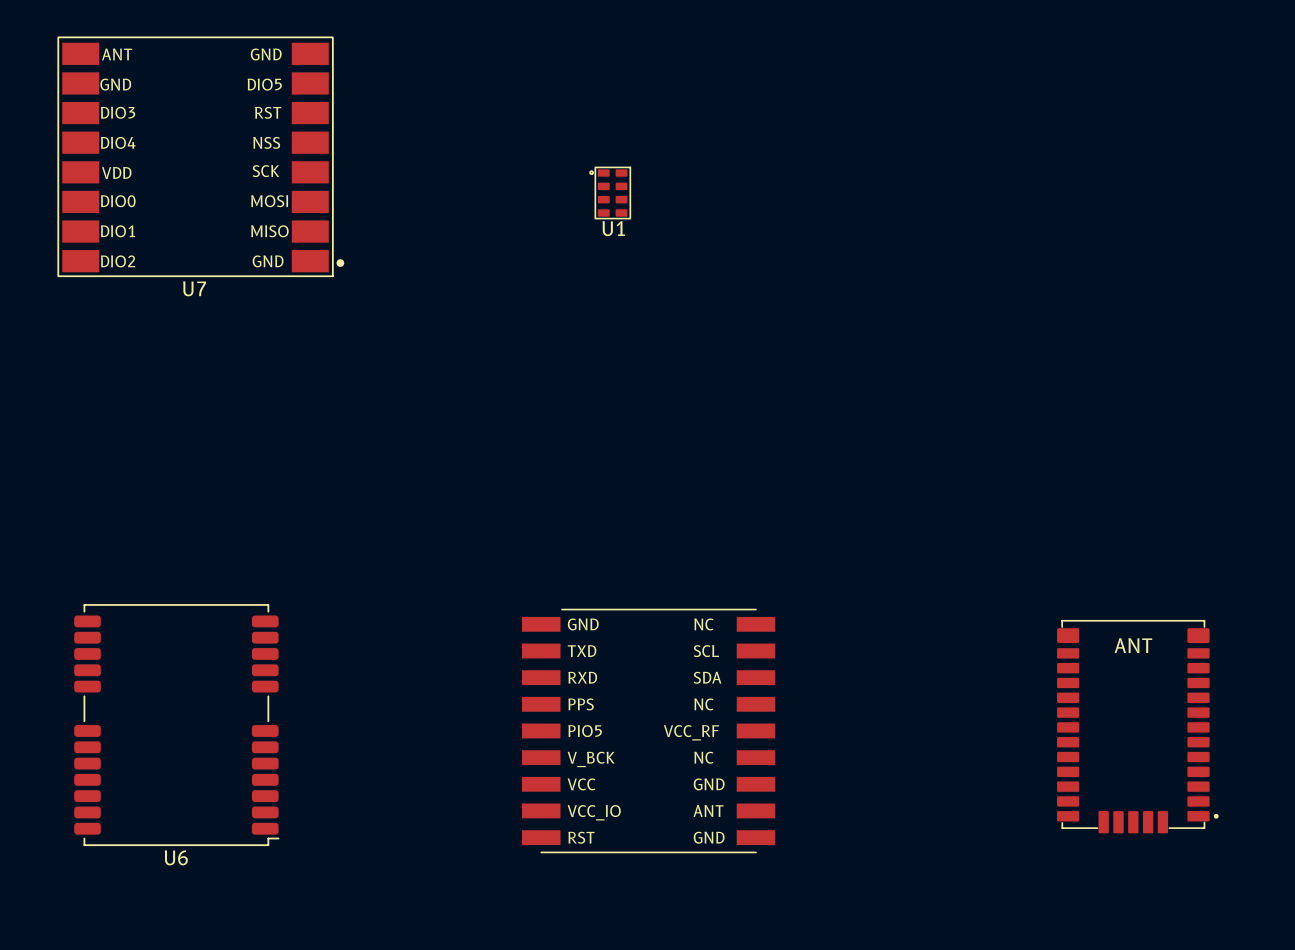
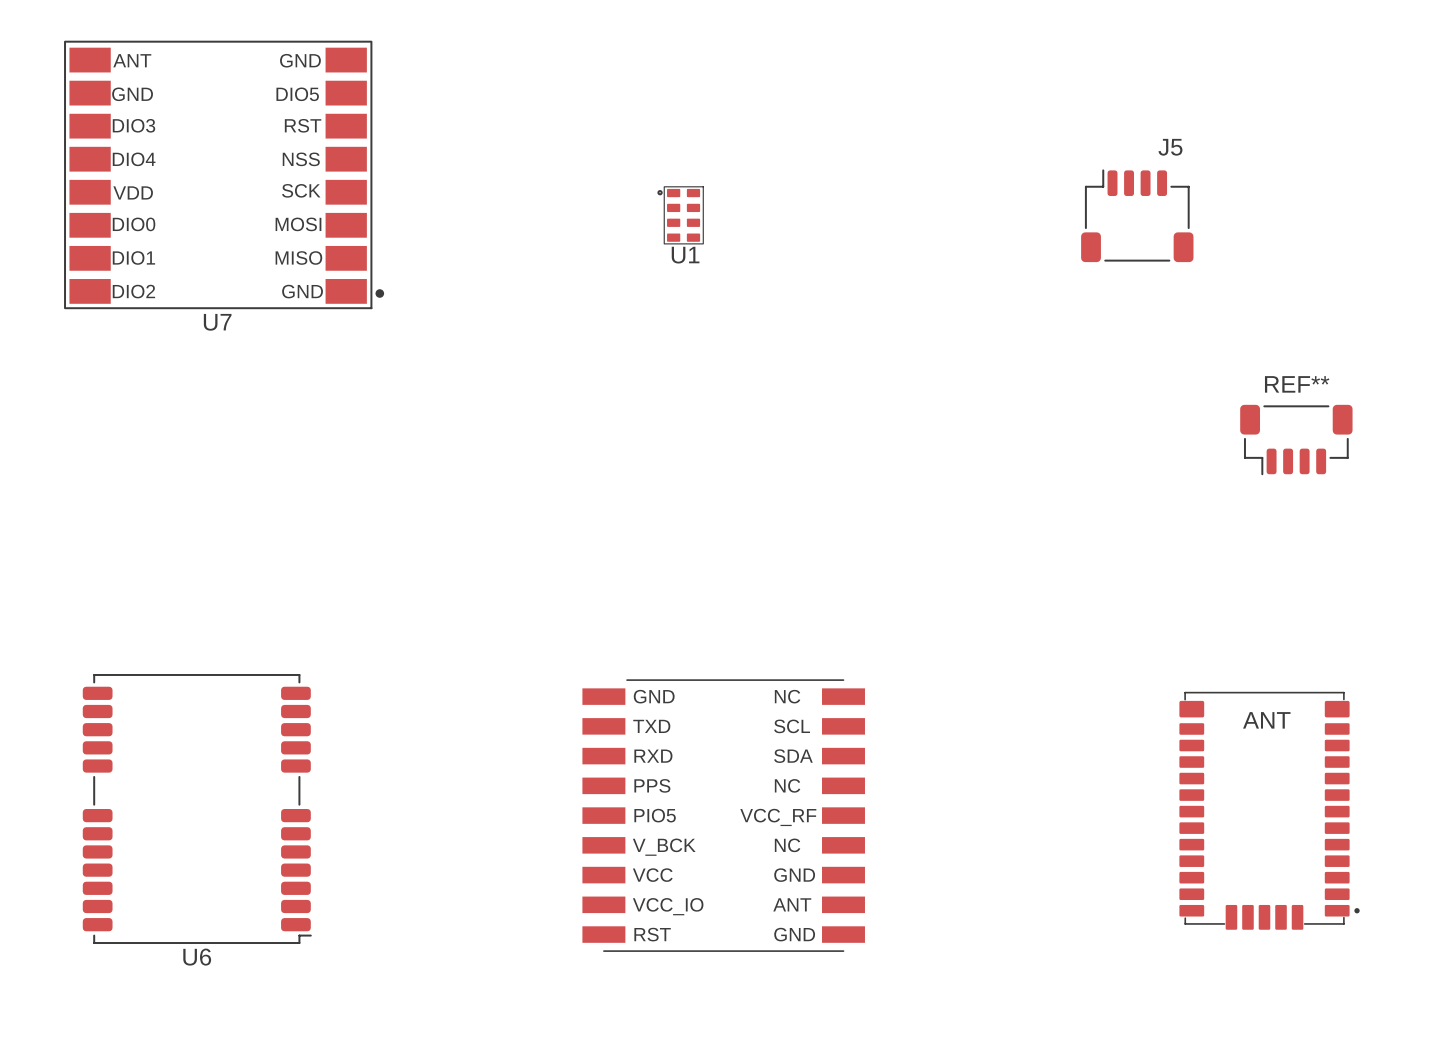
J5: none -> (1137, 215)
REF**: none -> (1296, 440)

